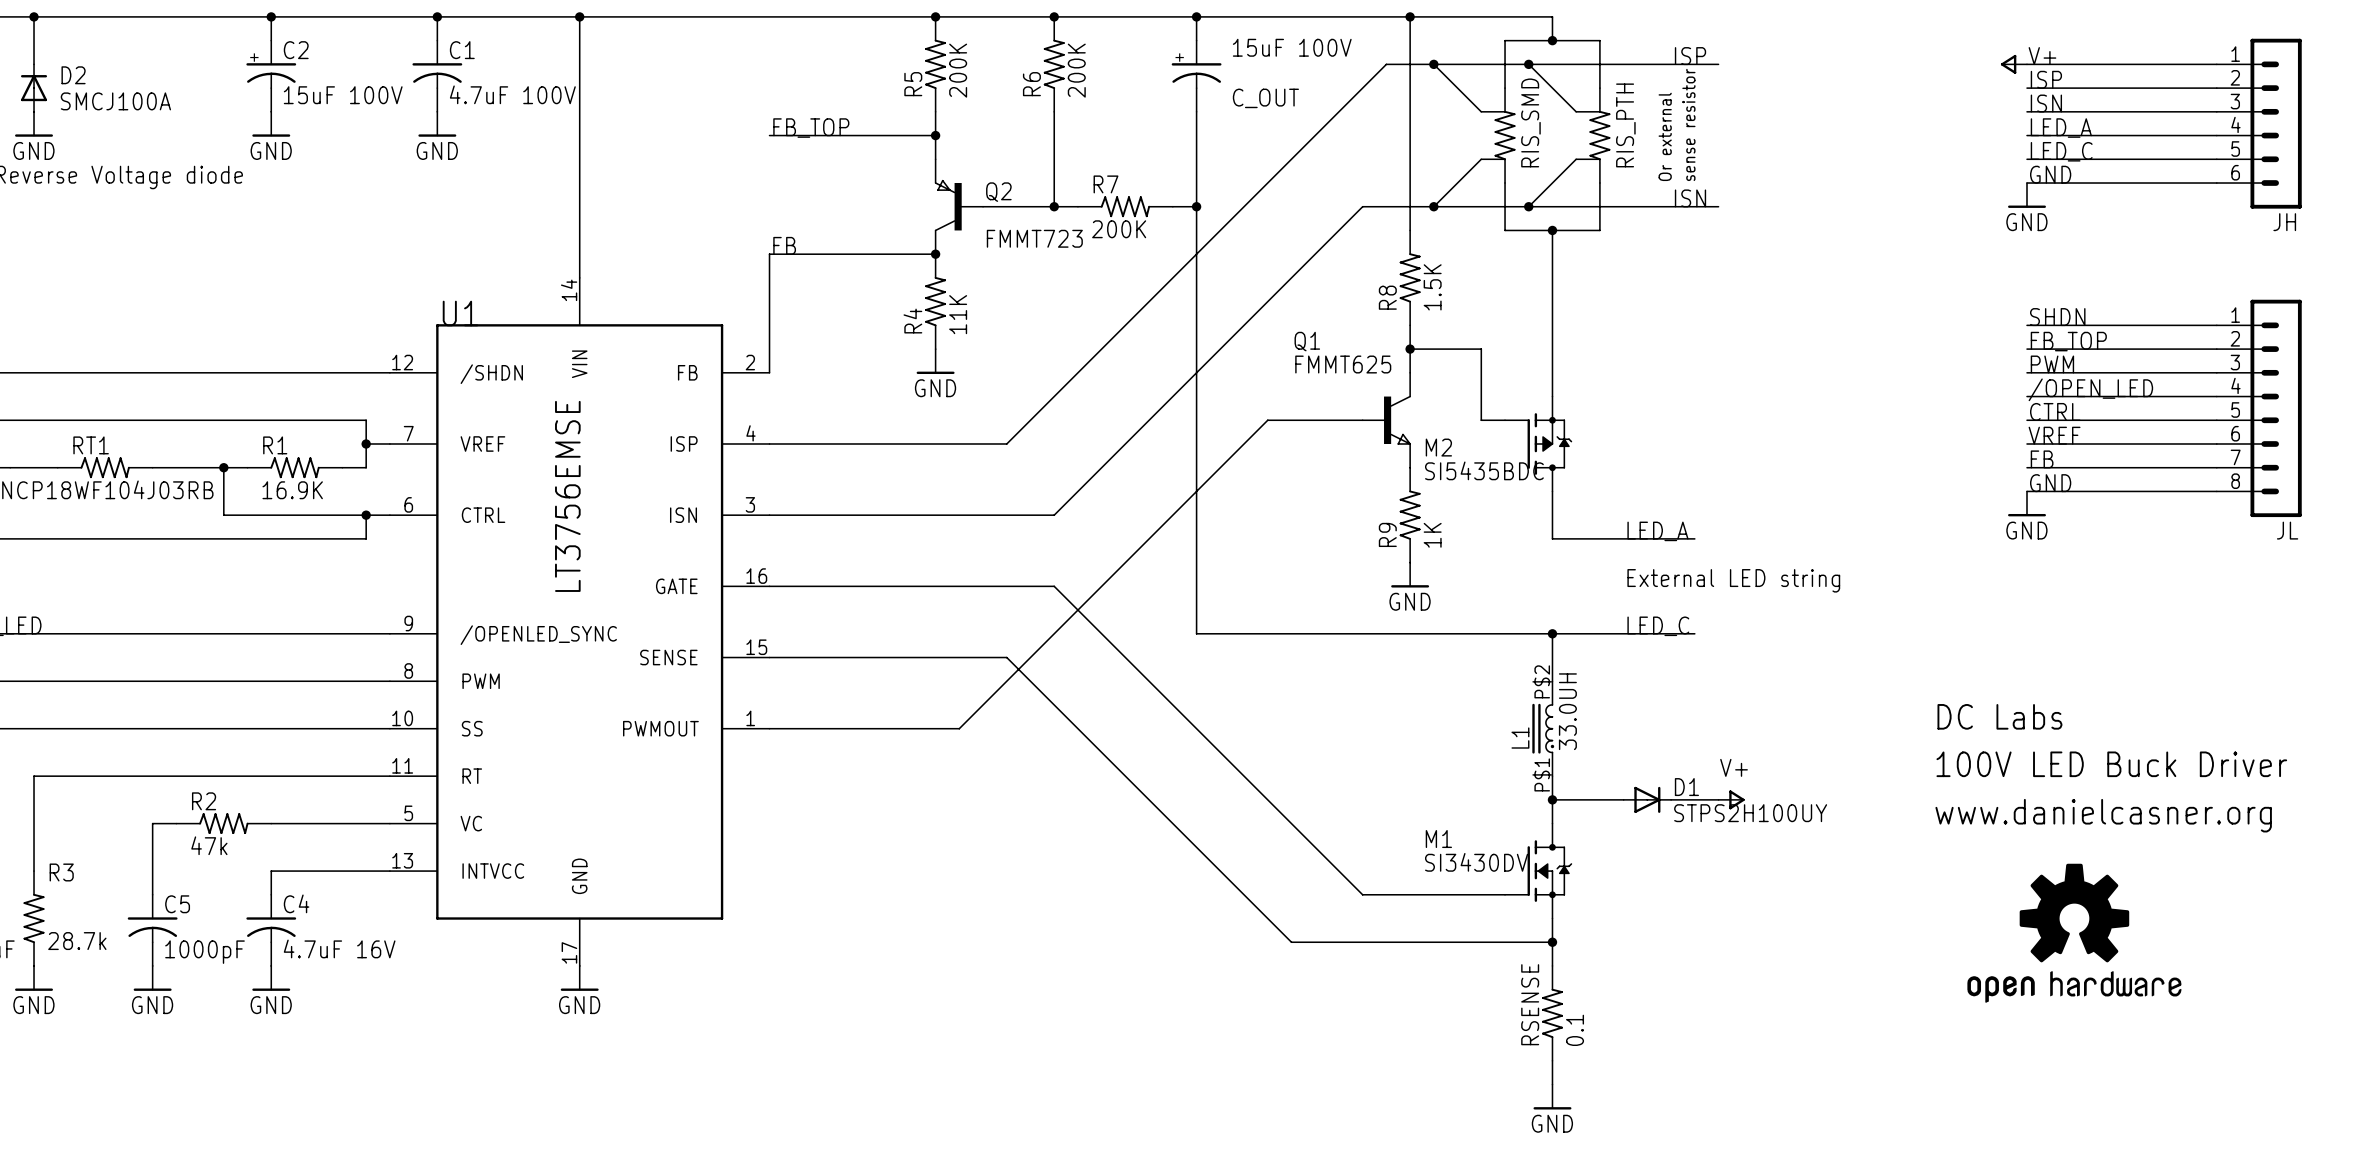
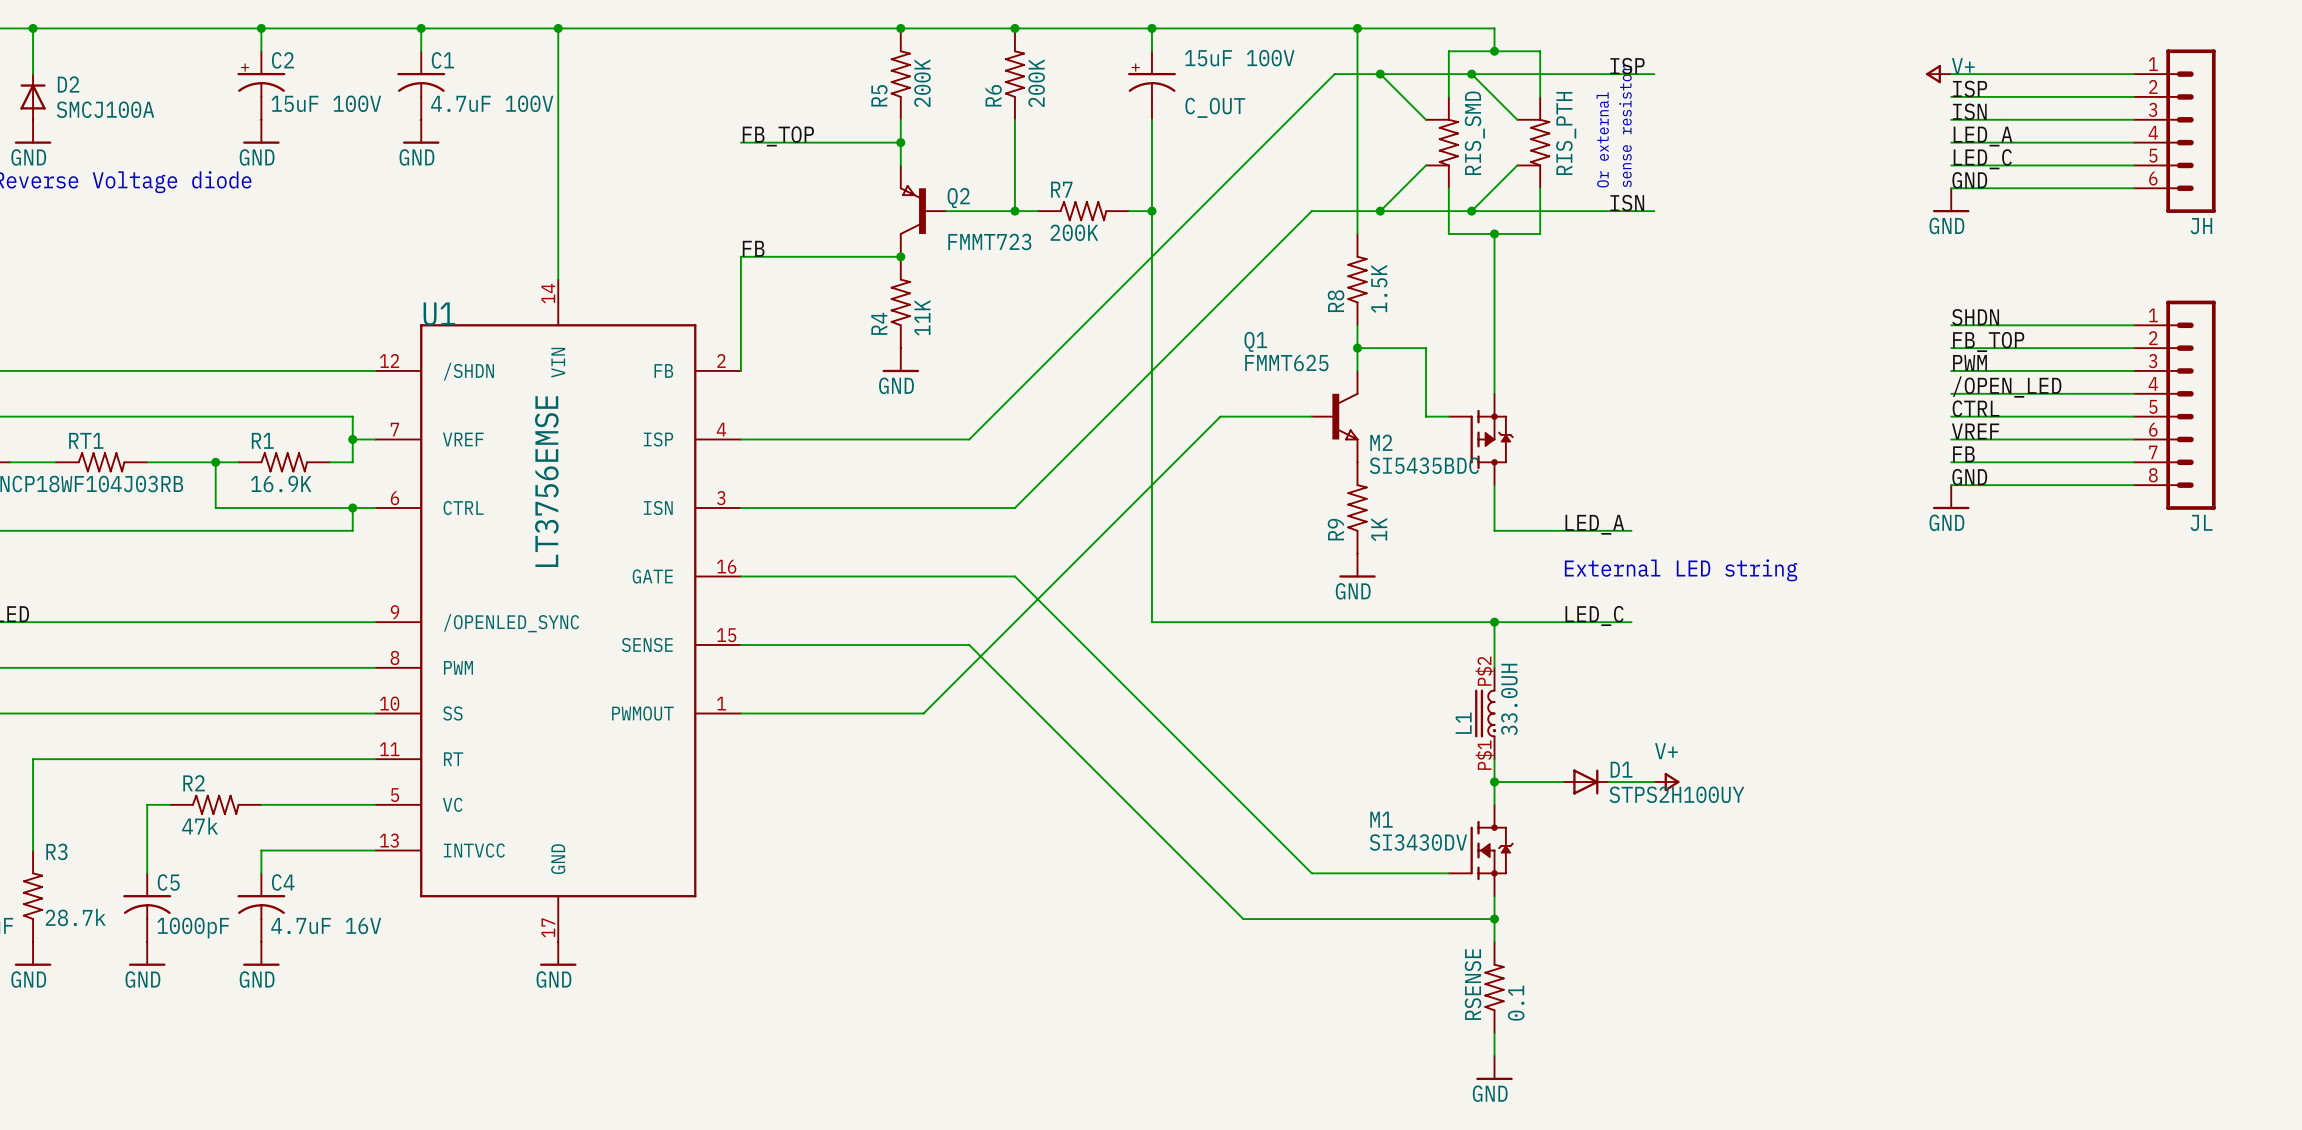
text: DC Labs (1999, 716) -> none
text: 100V LED Buck Driver (2111, 764) -> none
text: www.danielcasner.org (2103, 815) -> none
part: (2074, 933) -> none

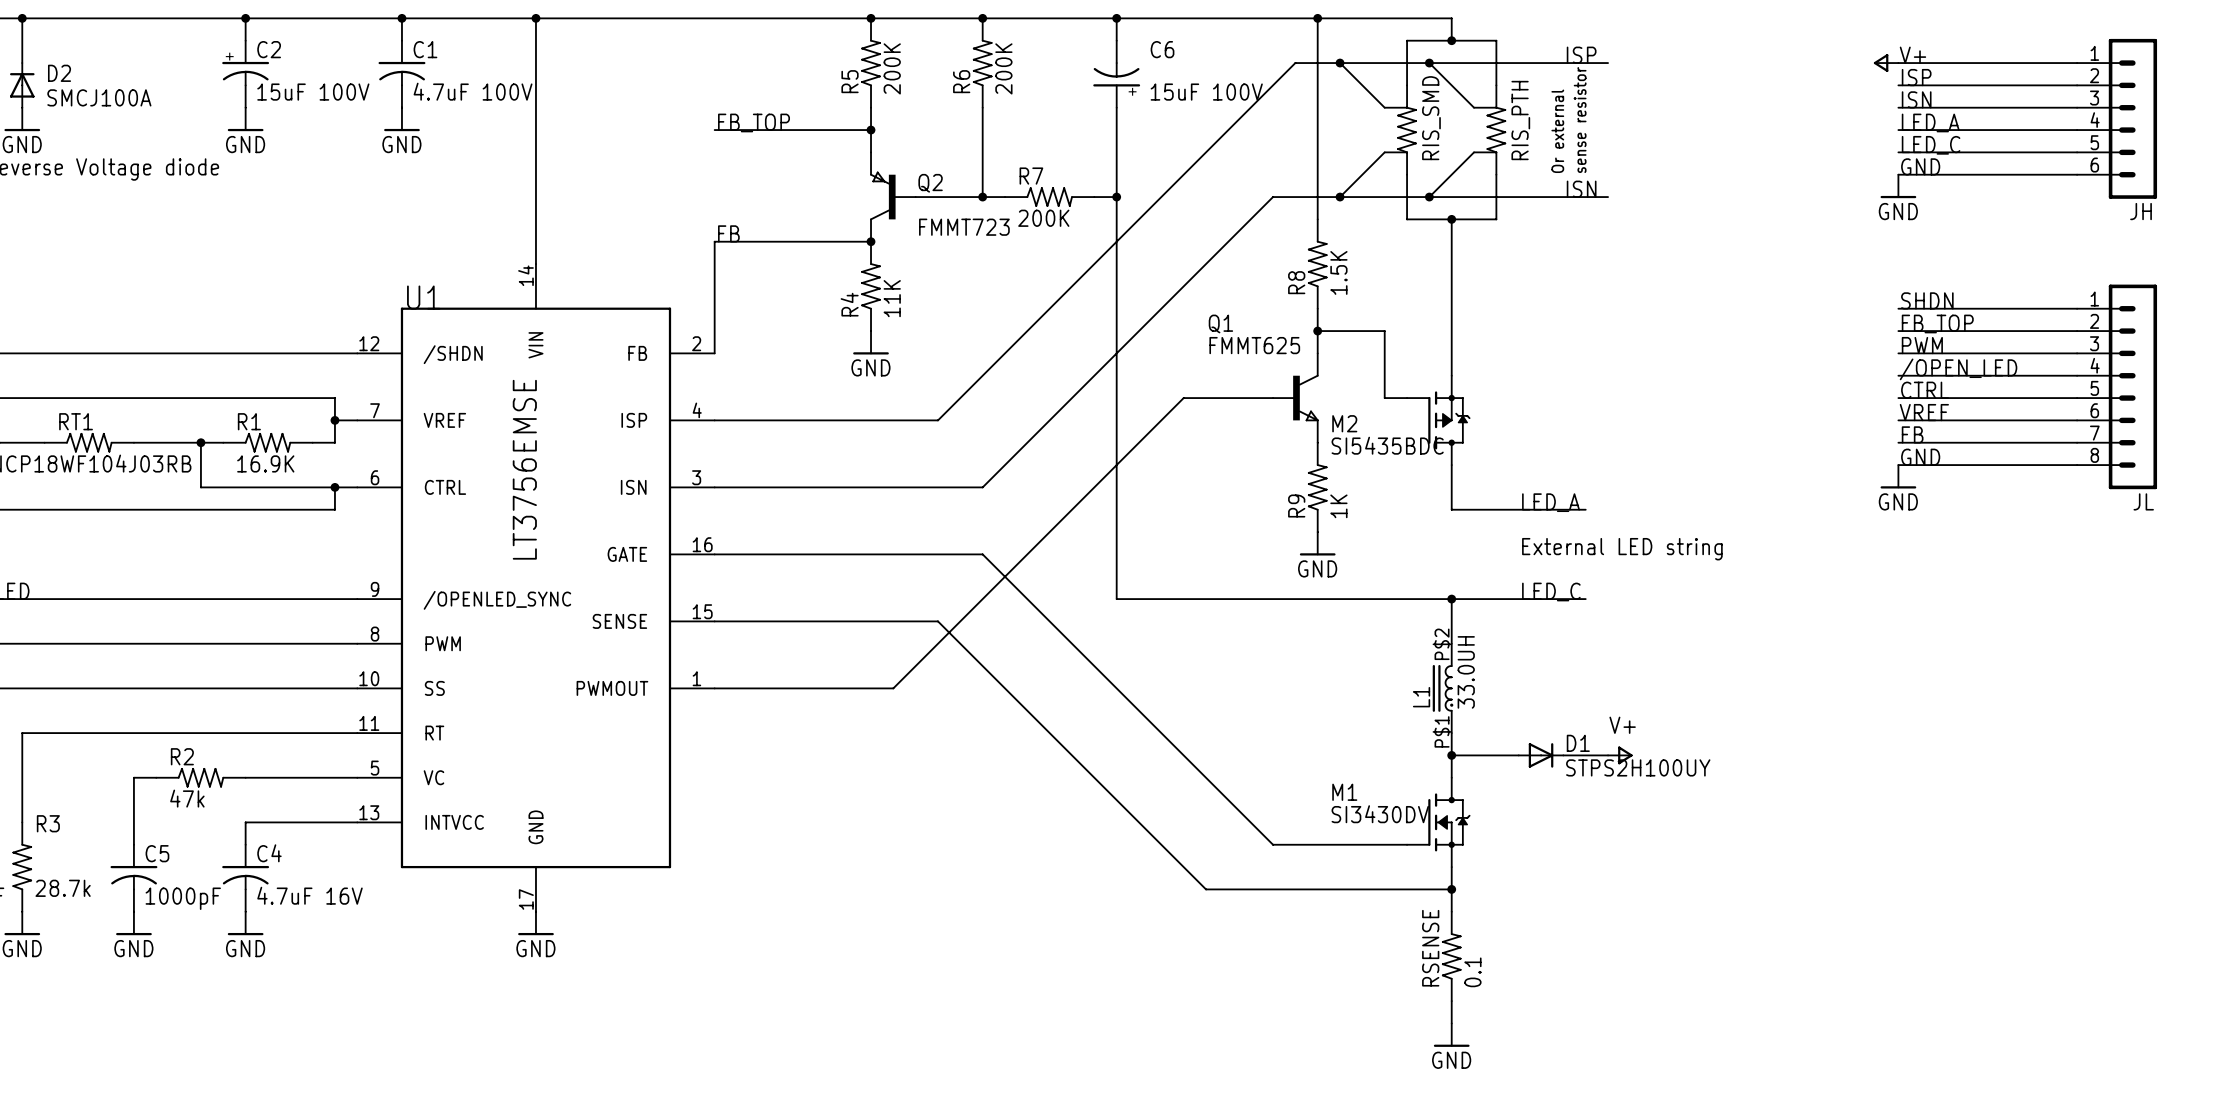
C_OUT: 15uF 100V (1151, 85) -> none
C6: none -> 15uF 100V (1116, 74)

